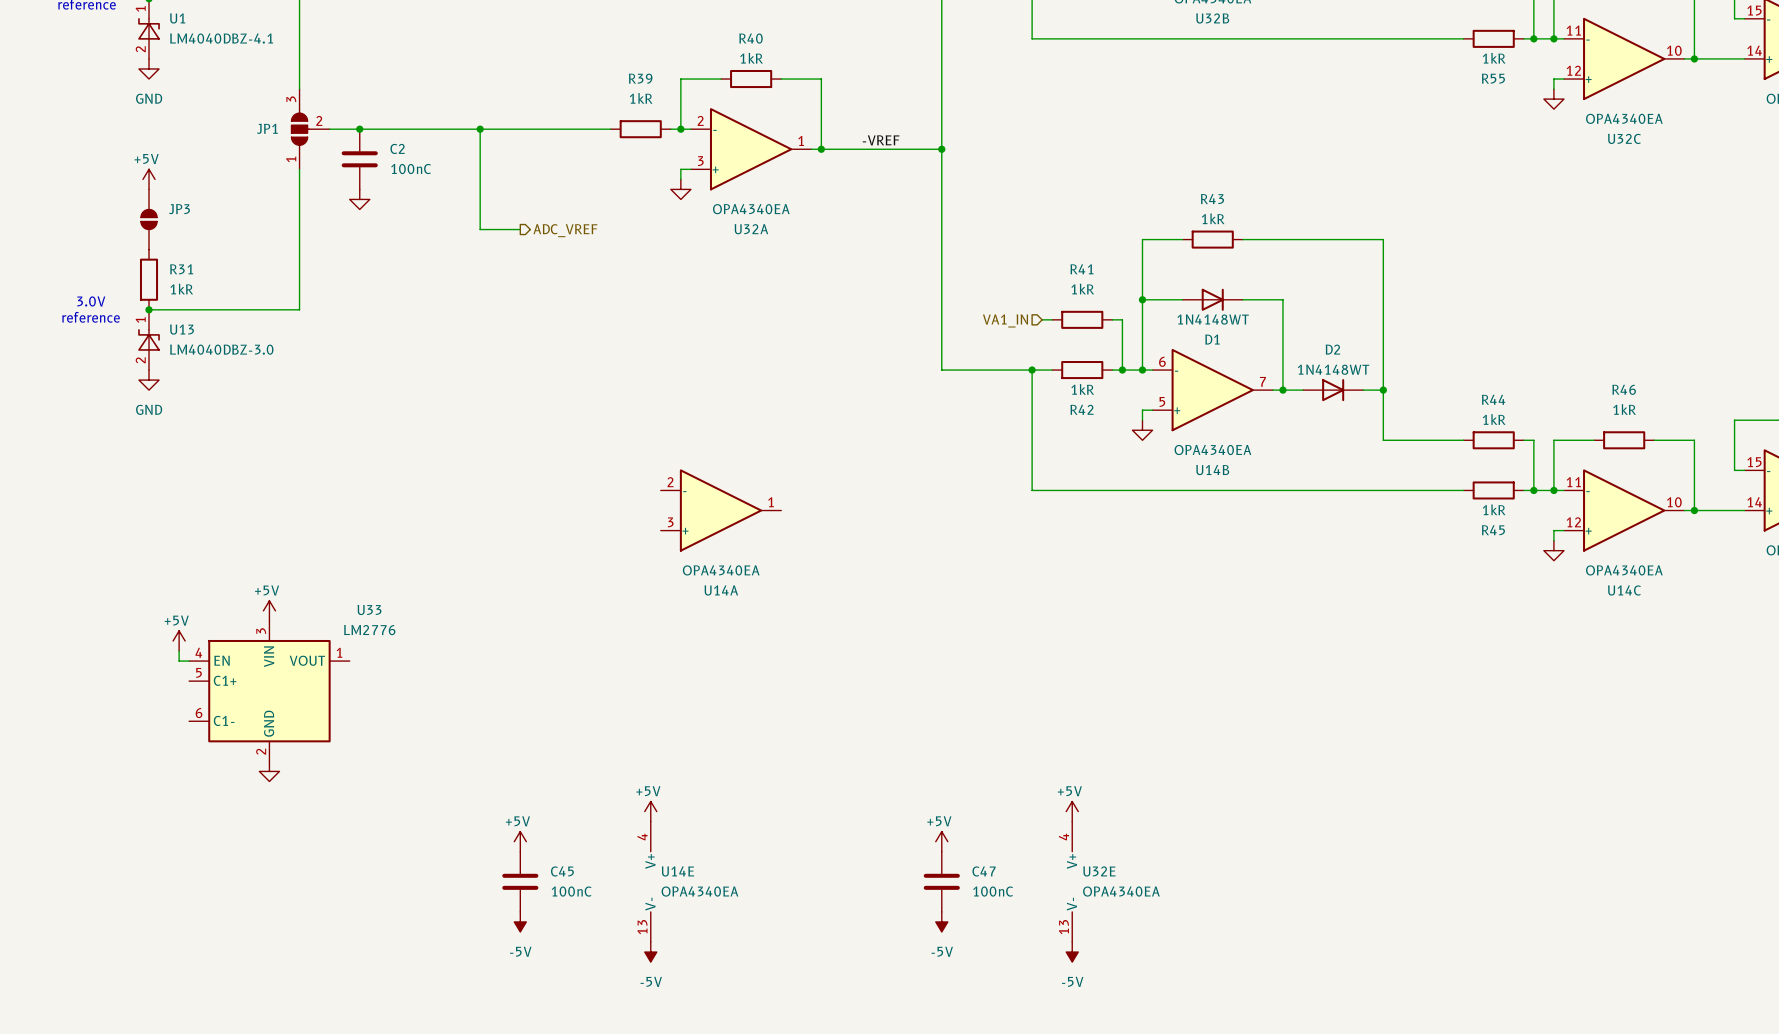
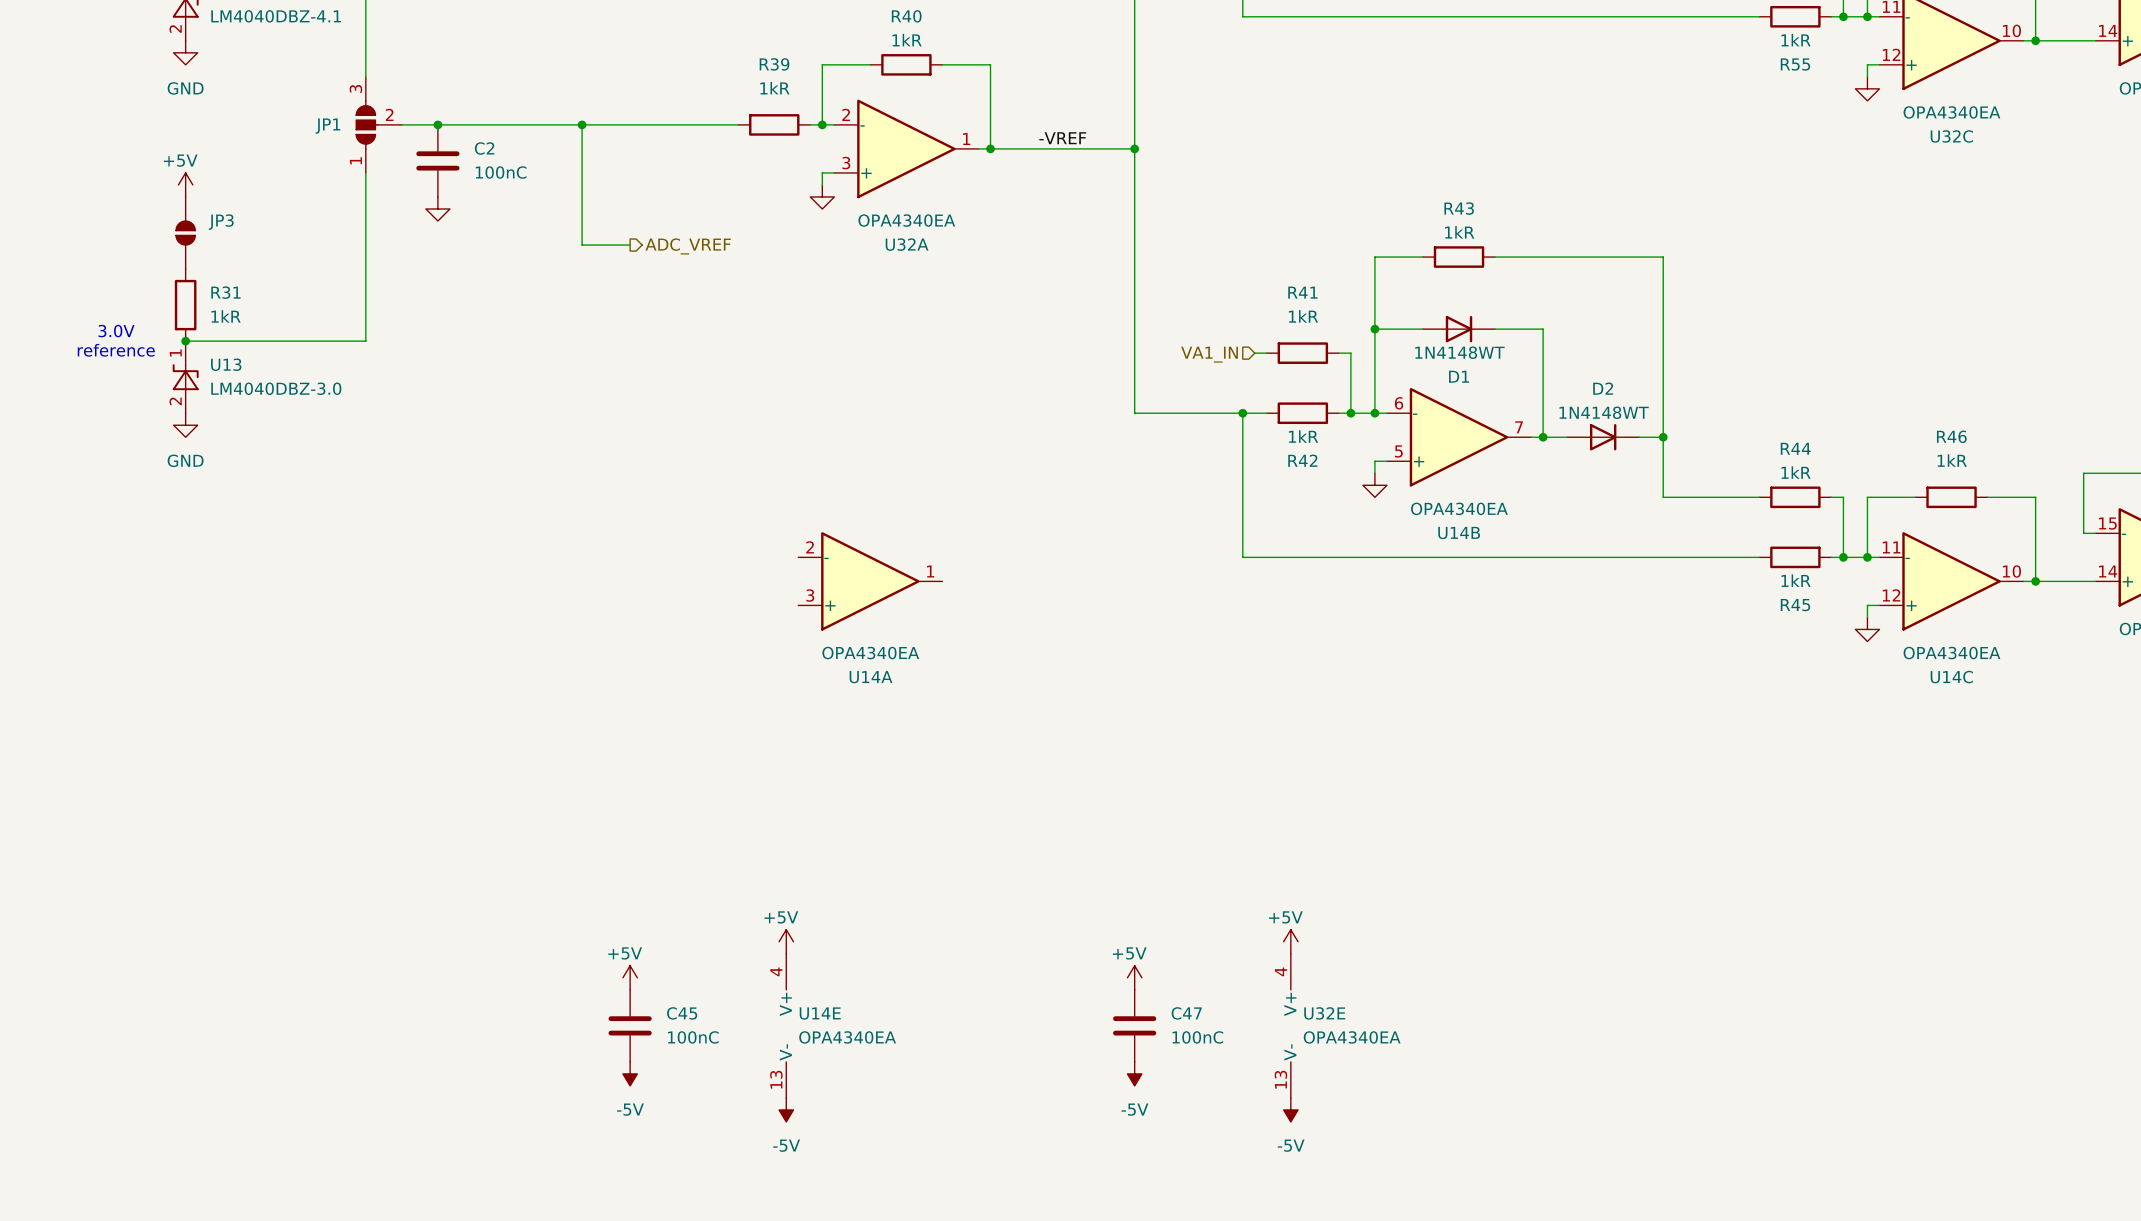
power symbol: +5V (269, 610) -> none
power symbol: +5V (179, 640) -> none
wire: (179, 651) (179, 661) (189, 661) -> none
U33: LM2776 (269, 691) -> none
power symbol: (269, 771) -> none

